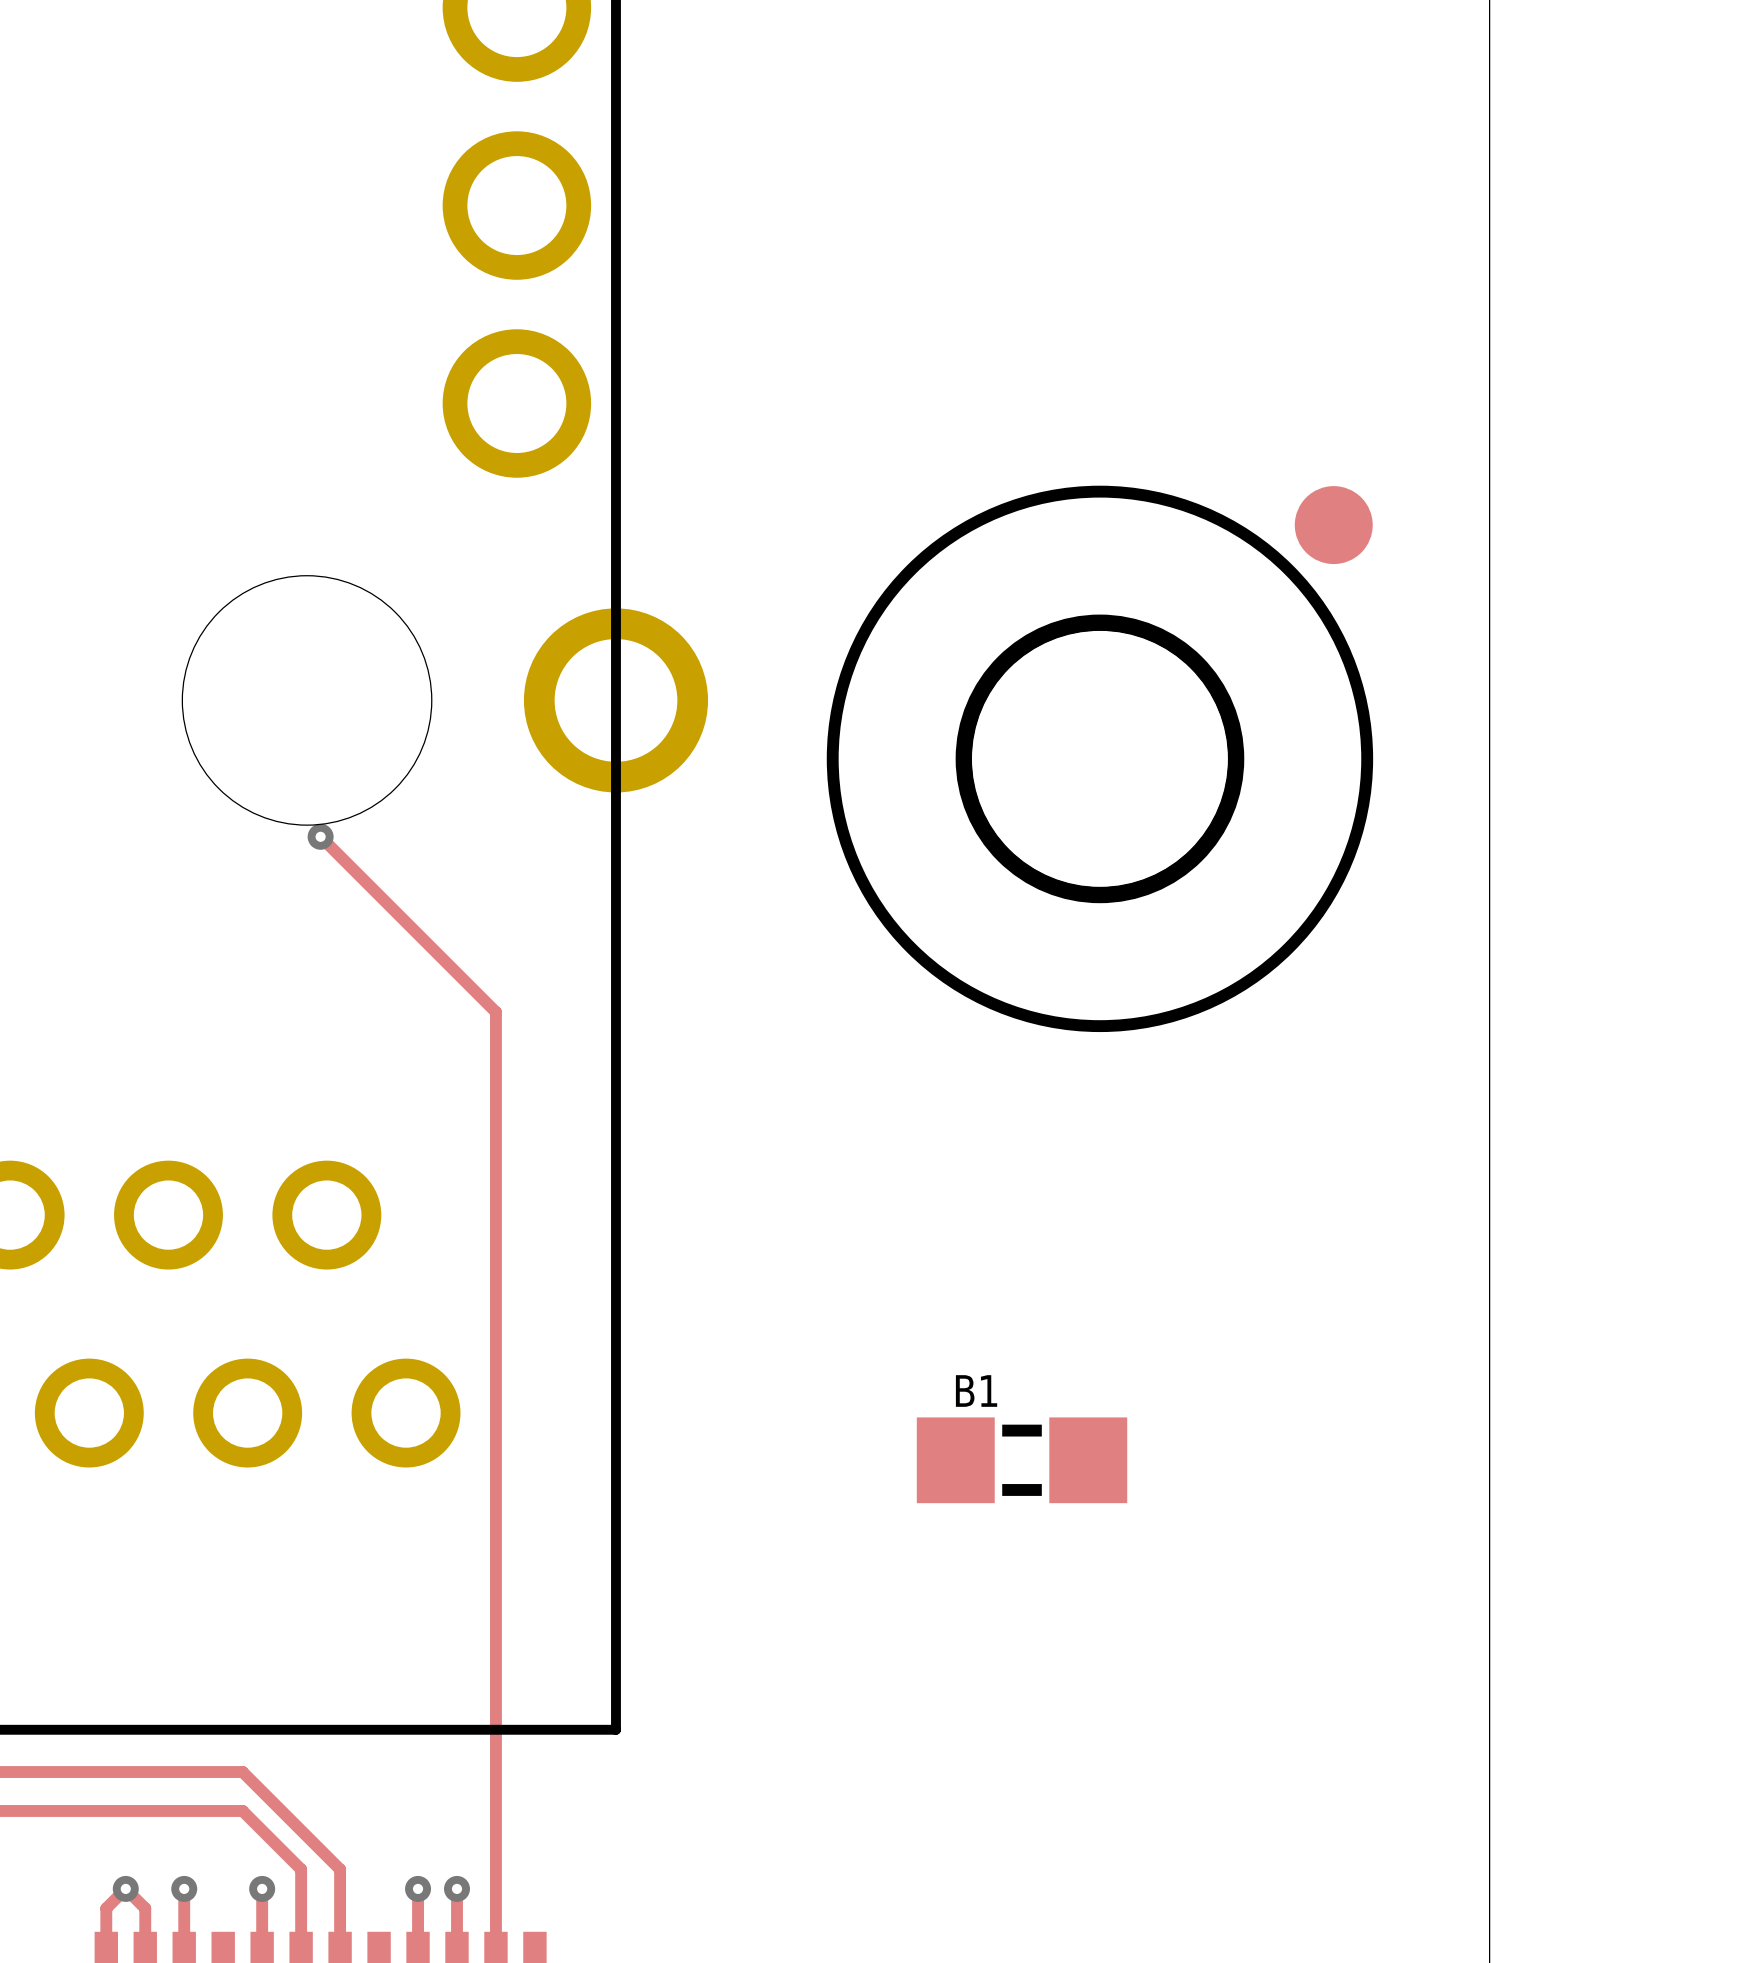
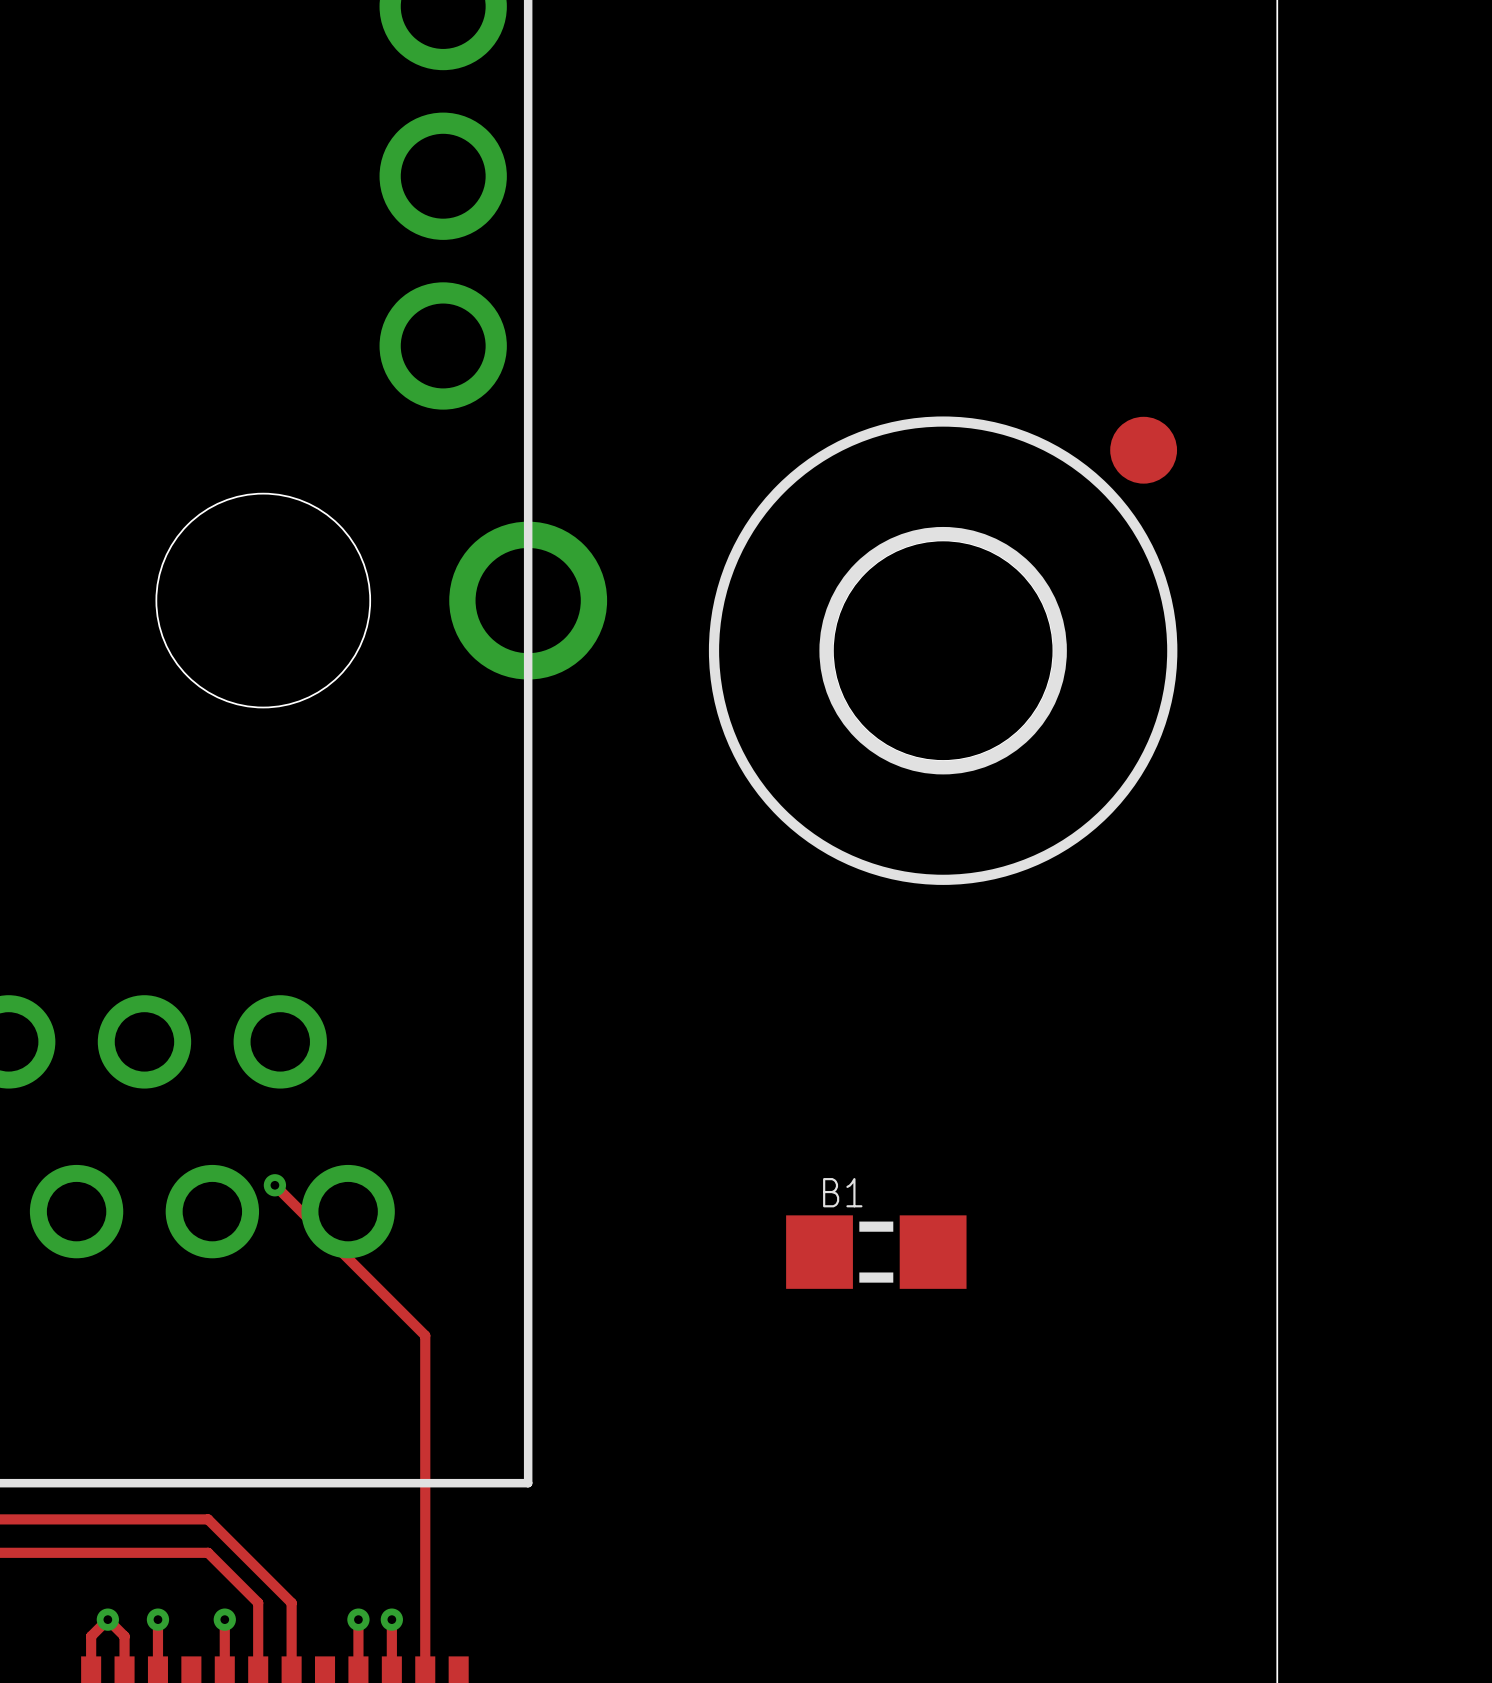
track: (320, 836) (495, 1012) (495, 1557) -> (274, 1185) (425, 1335)
via: (320, 836) -> none
via: none -> (274, 1185)

